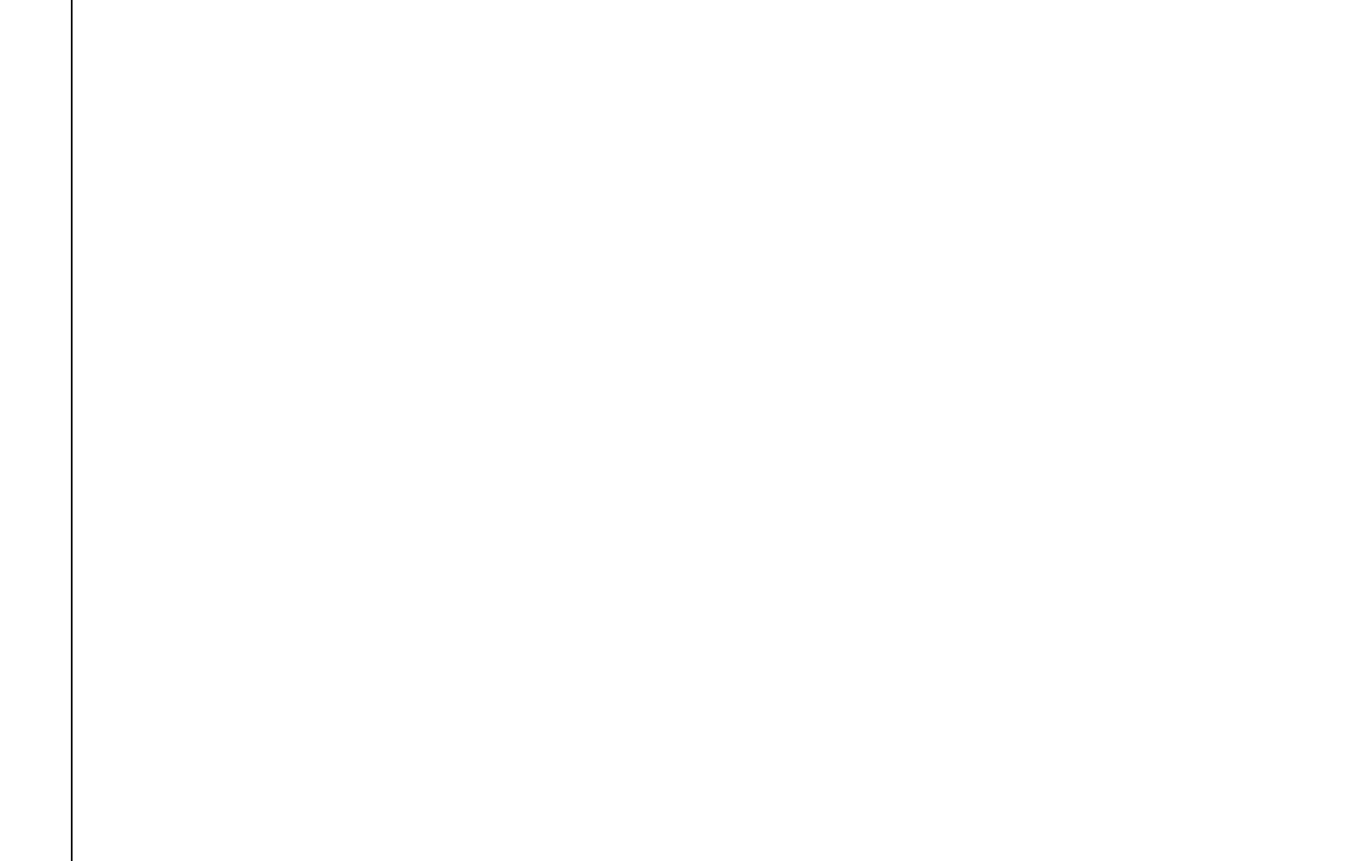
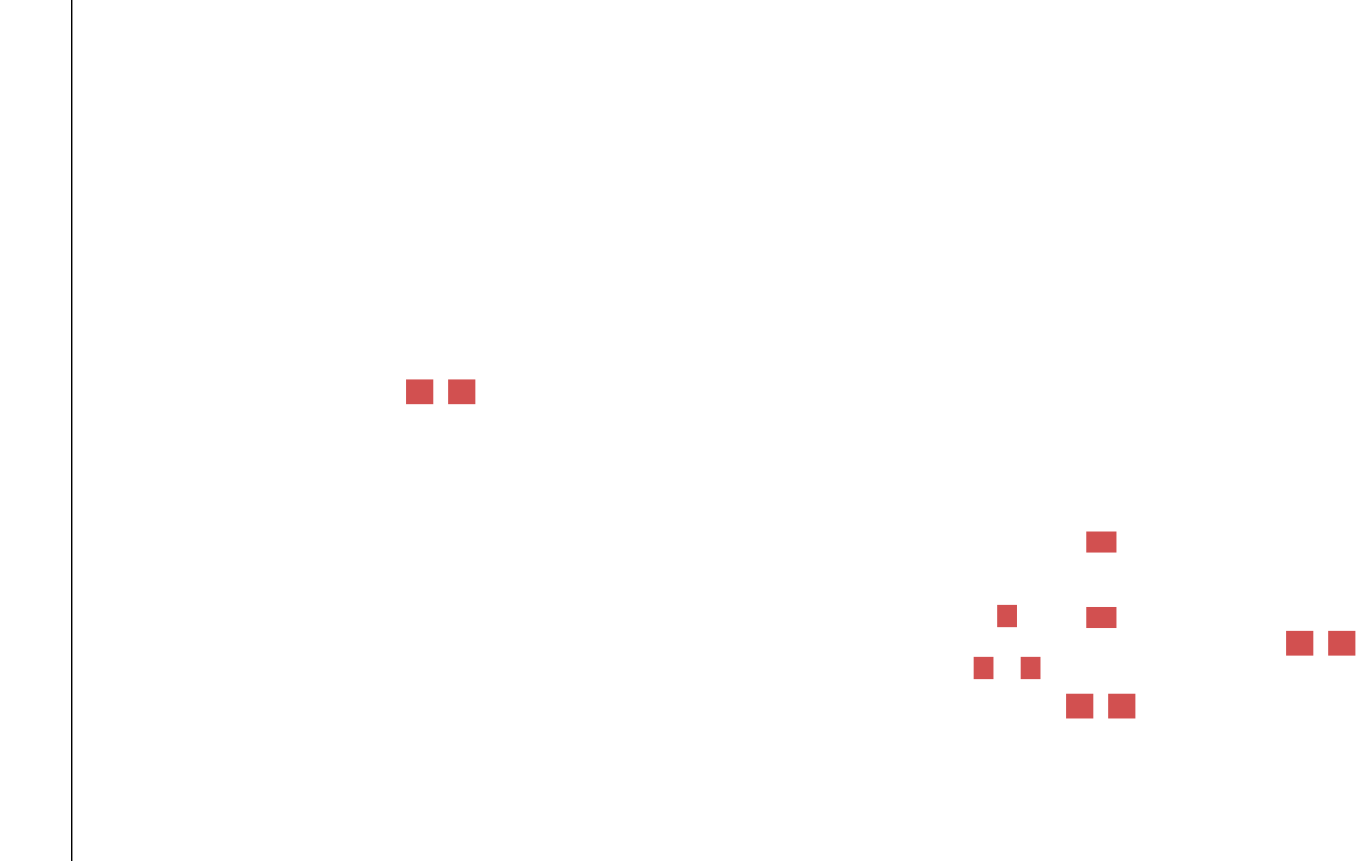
part: none -> (440, 391)
part: none -> (1101, 579)
part: none -> (1007, 642)
part: none -> (1320, 643)
part: none -> (1100, 706)

